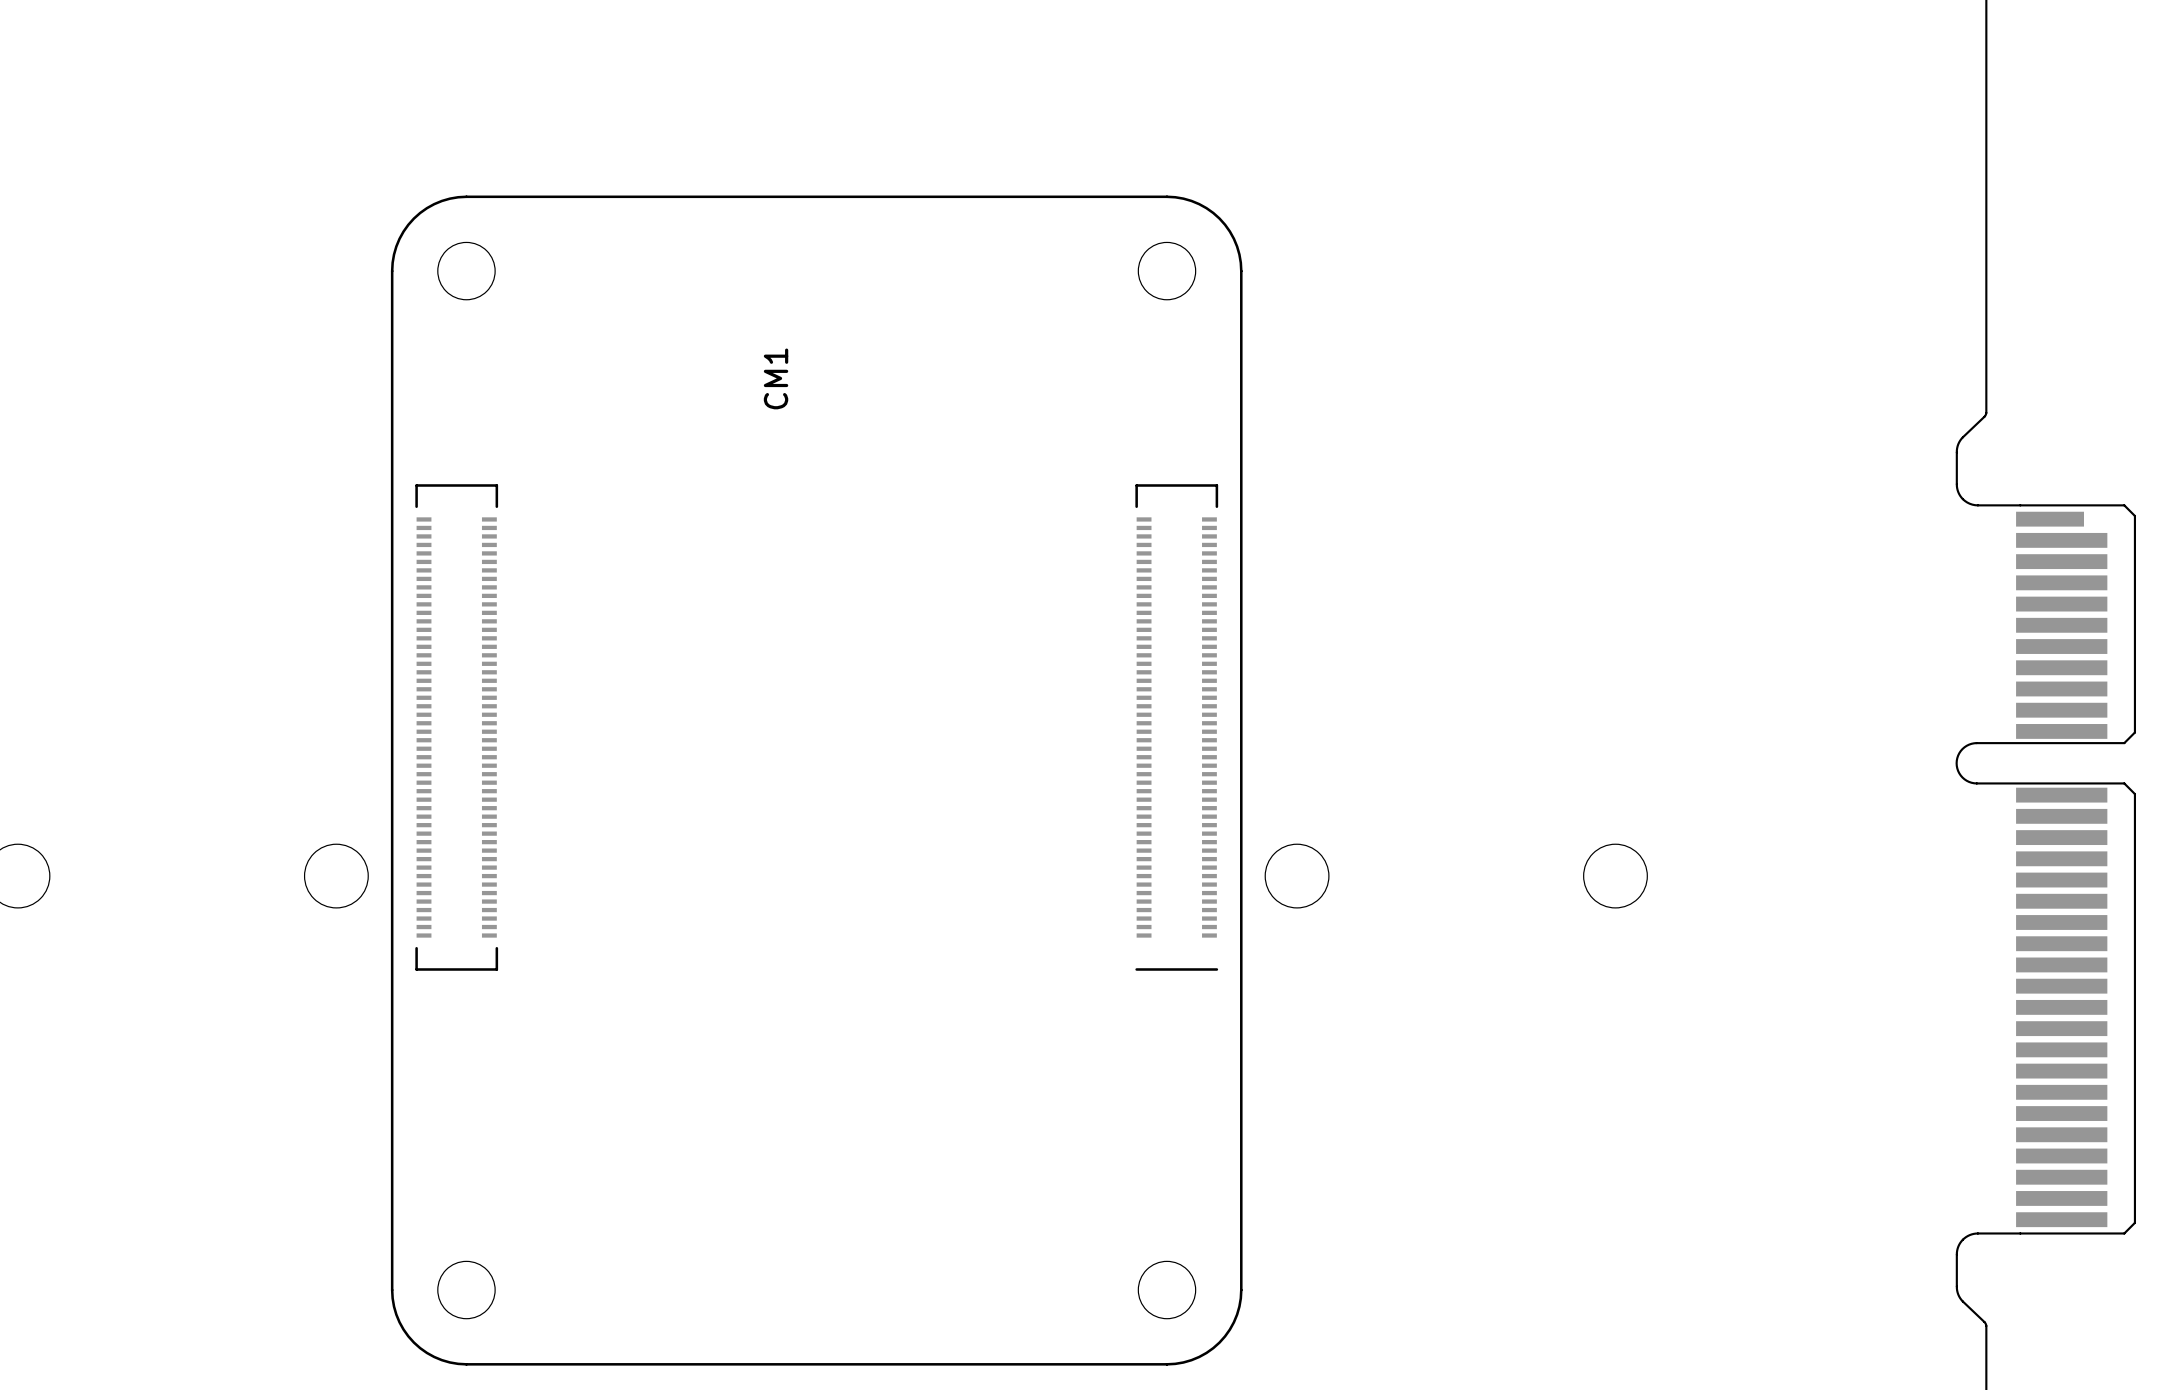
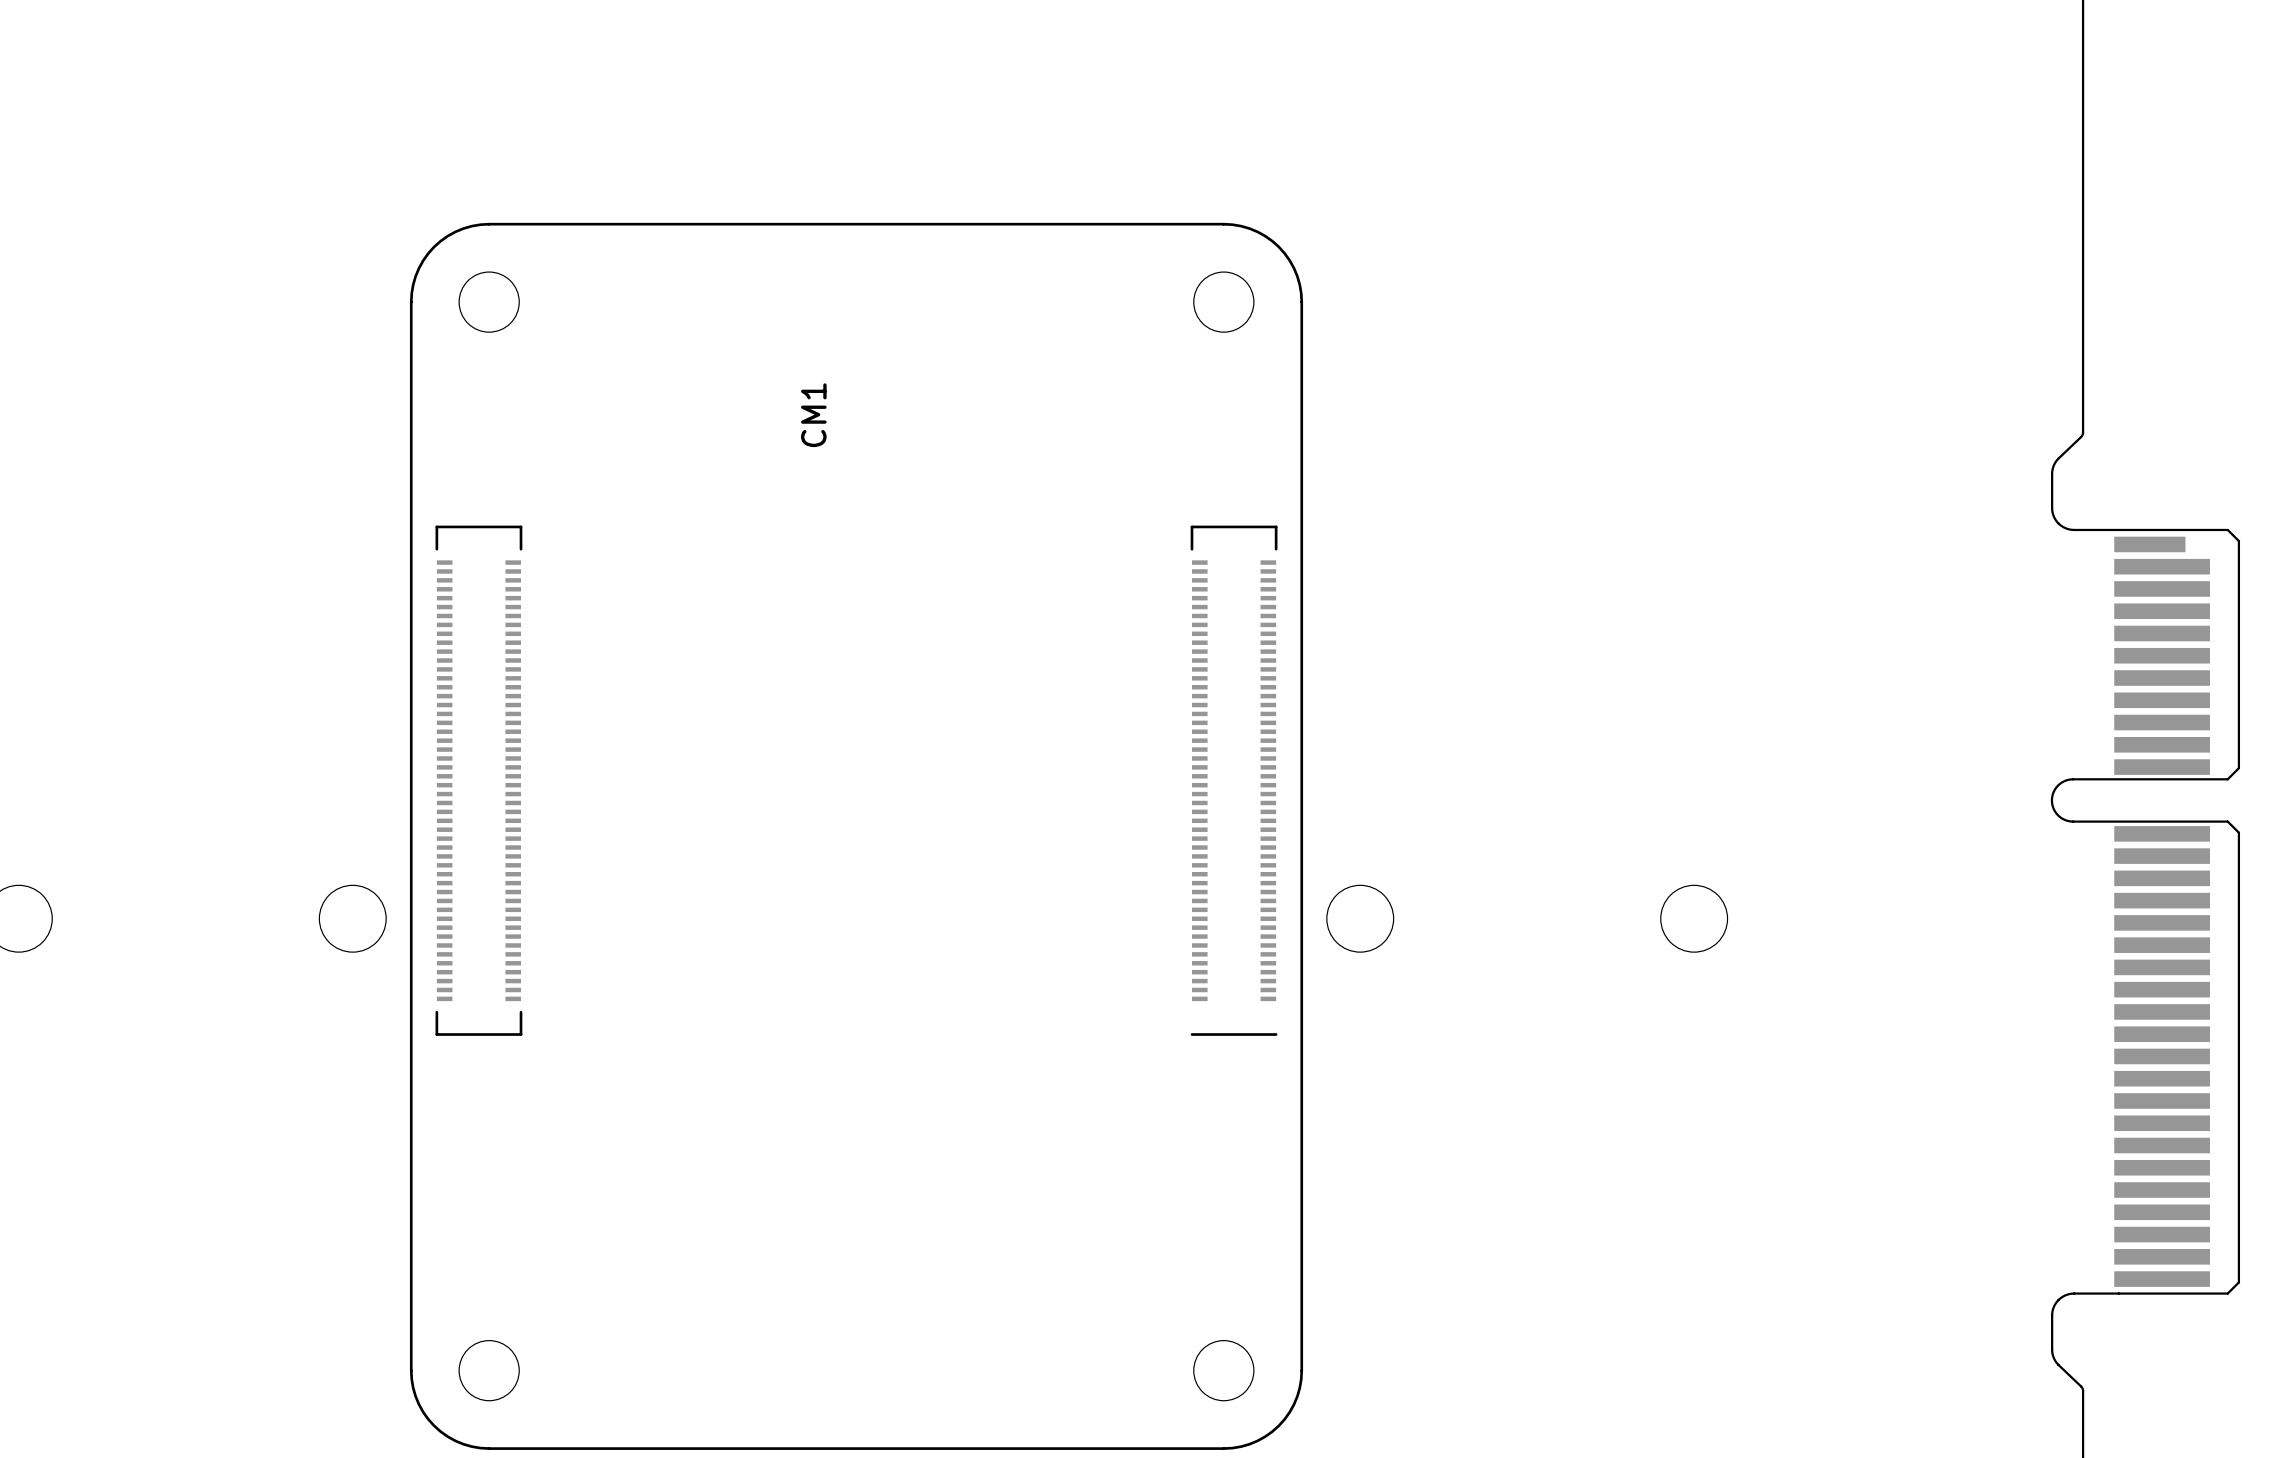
CM1 position: (816, 780) -> (856, 836)

